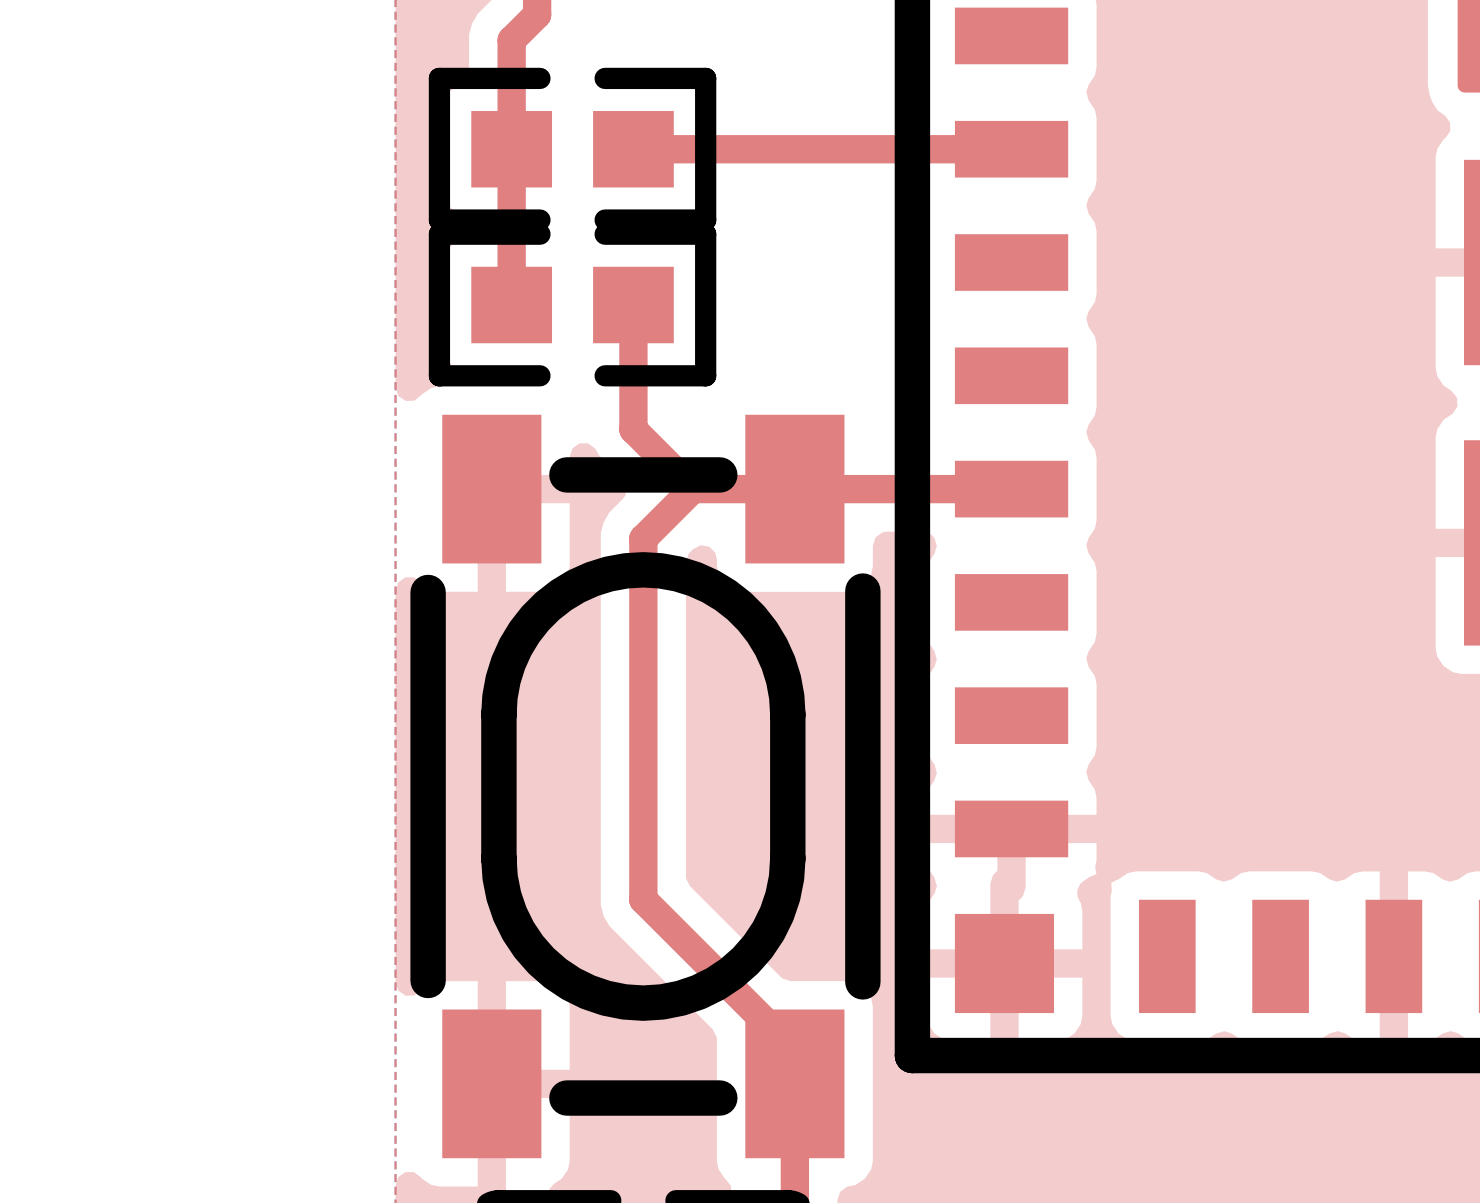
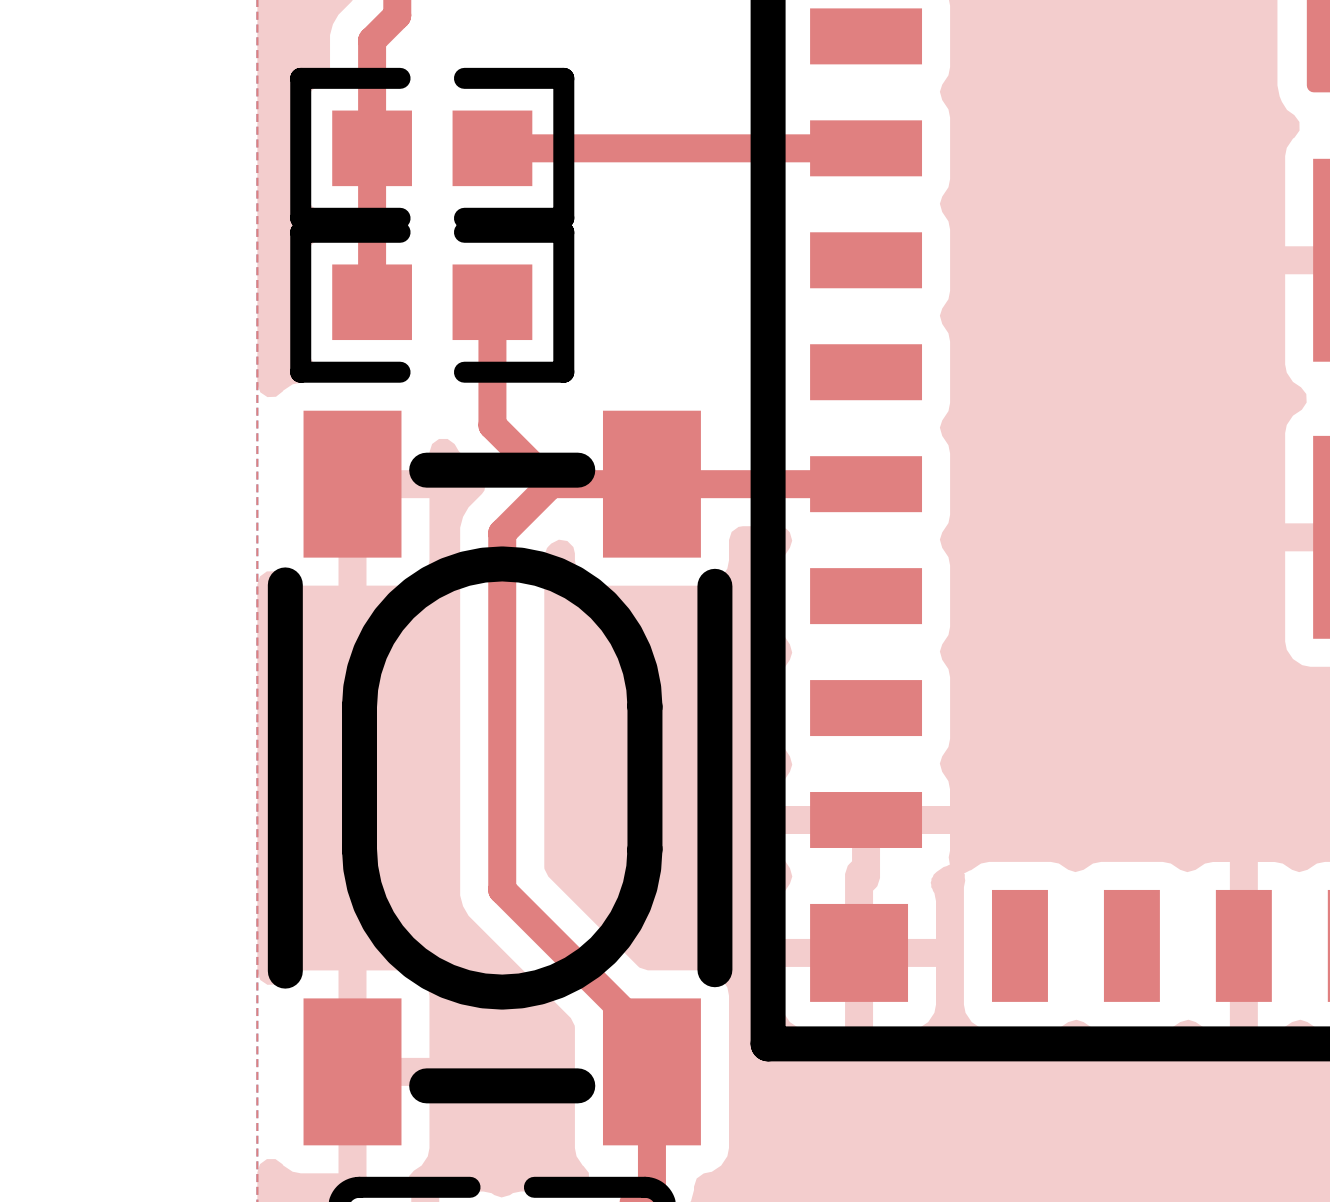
part footprint: [410, 414, 881, 1159] -> [267, 410, 733, 1146]

